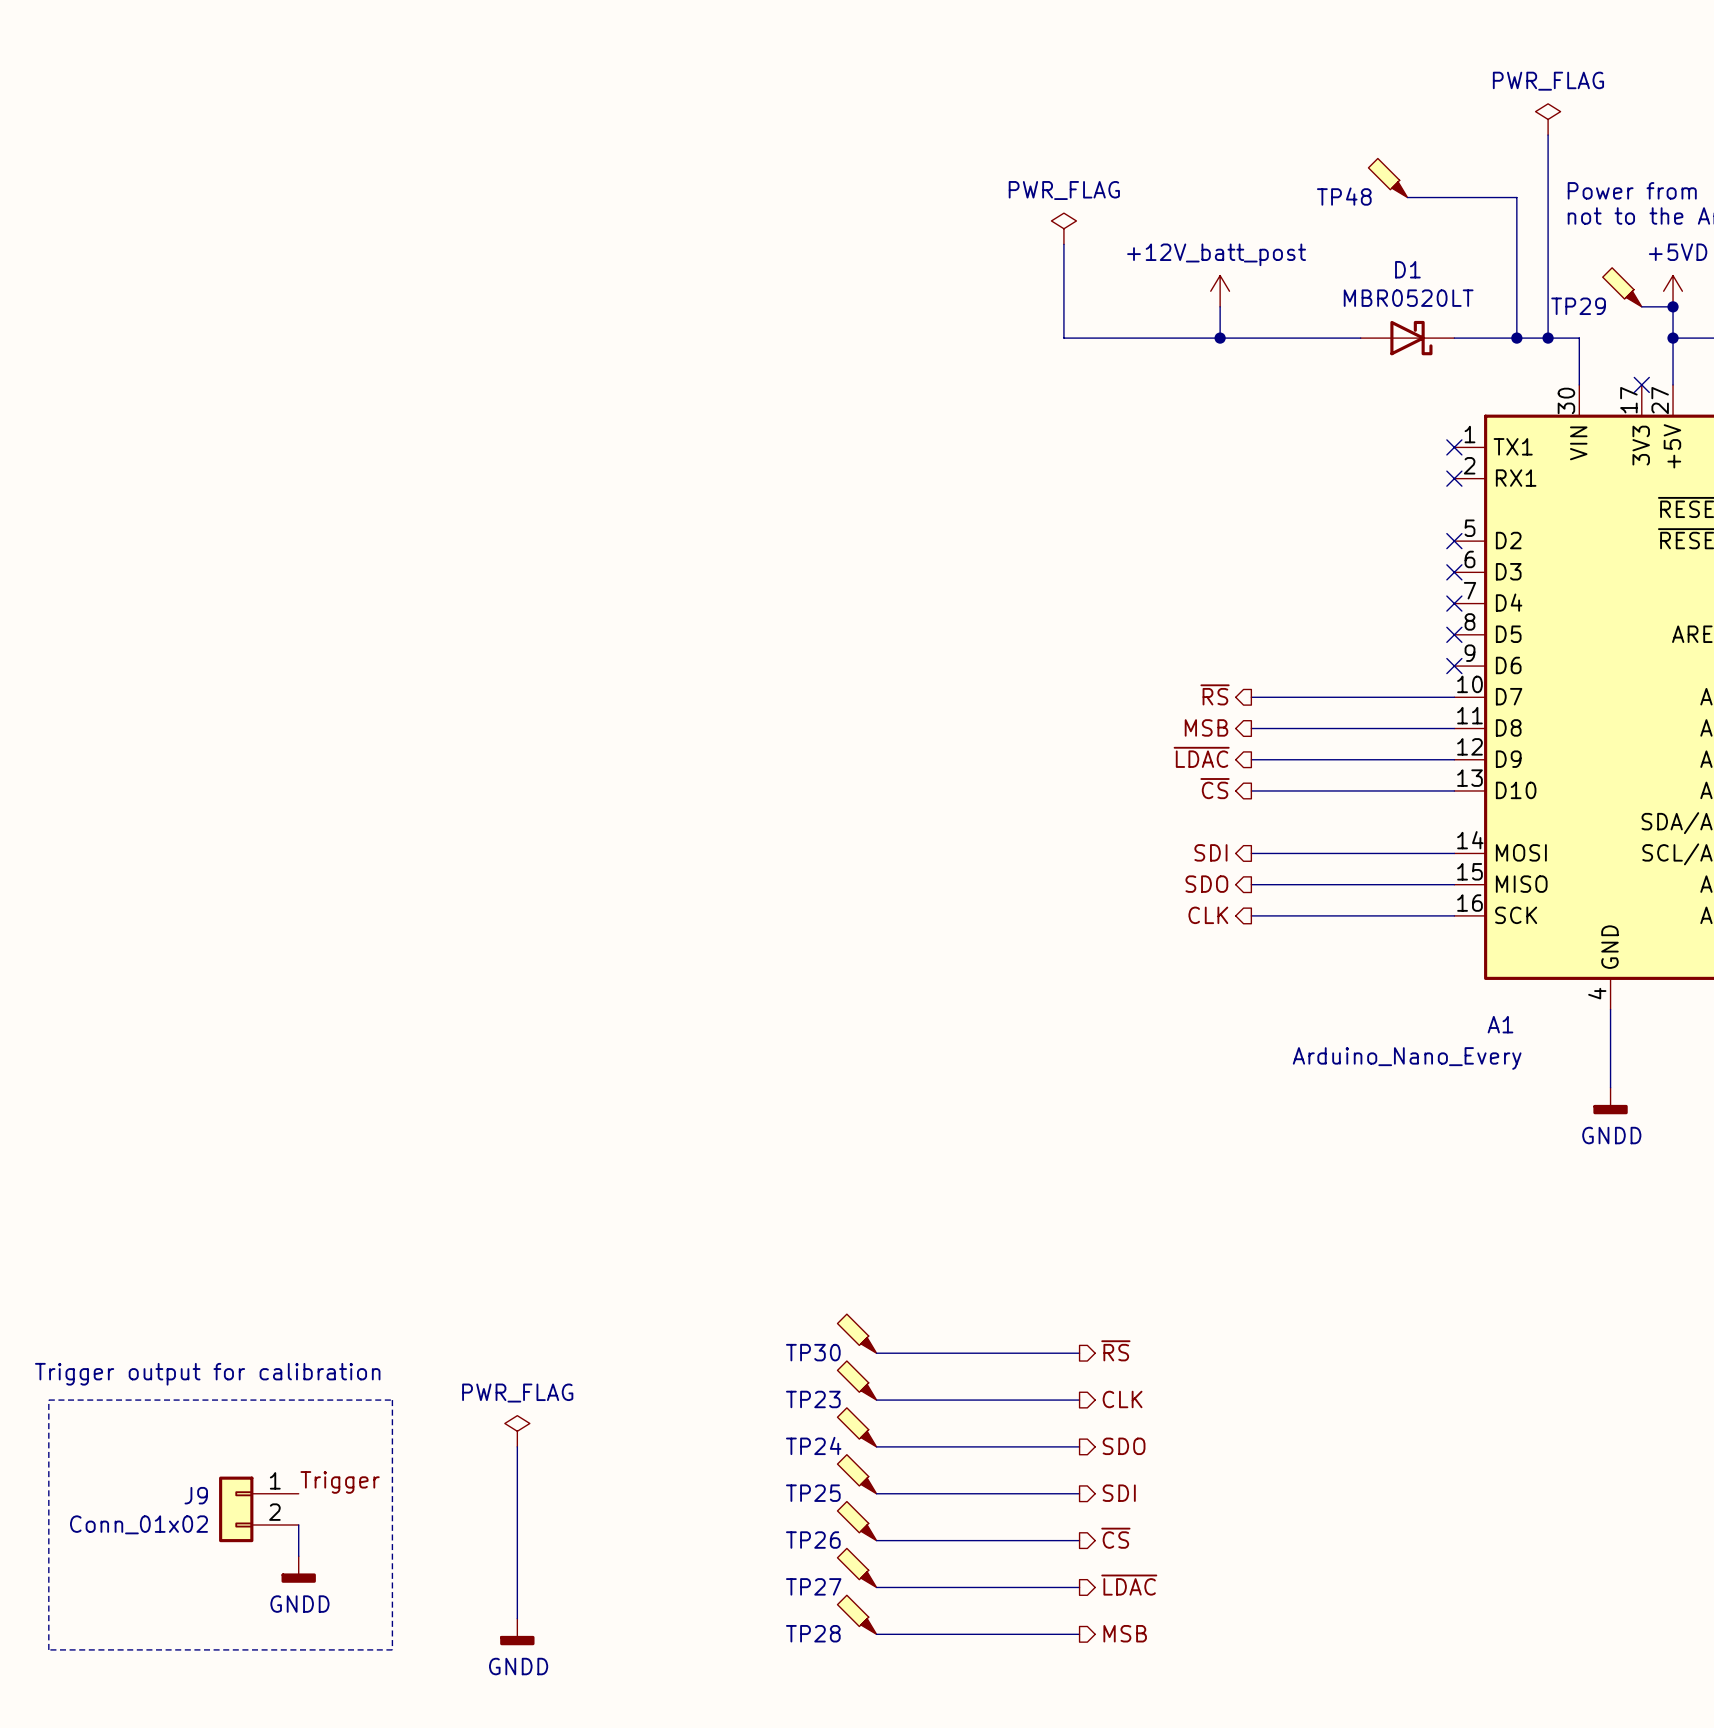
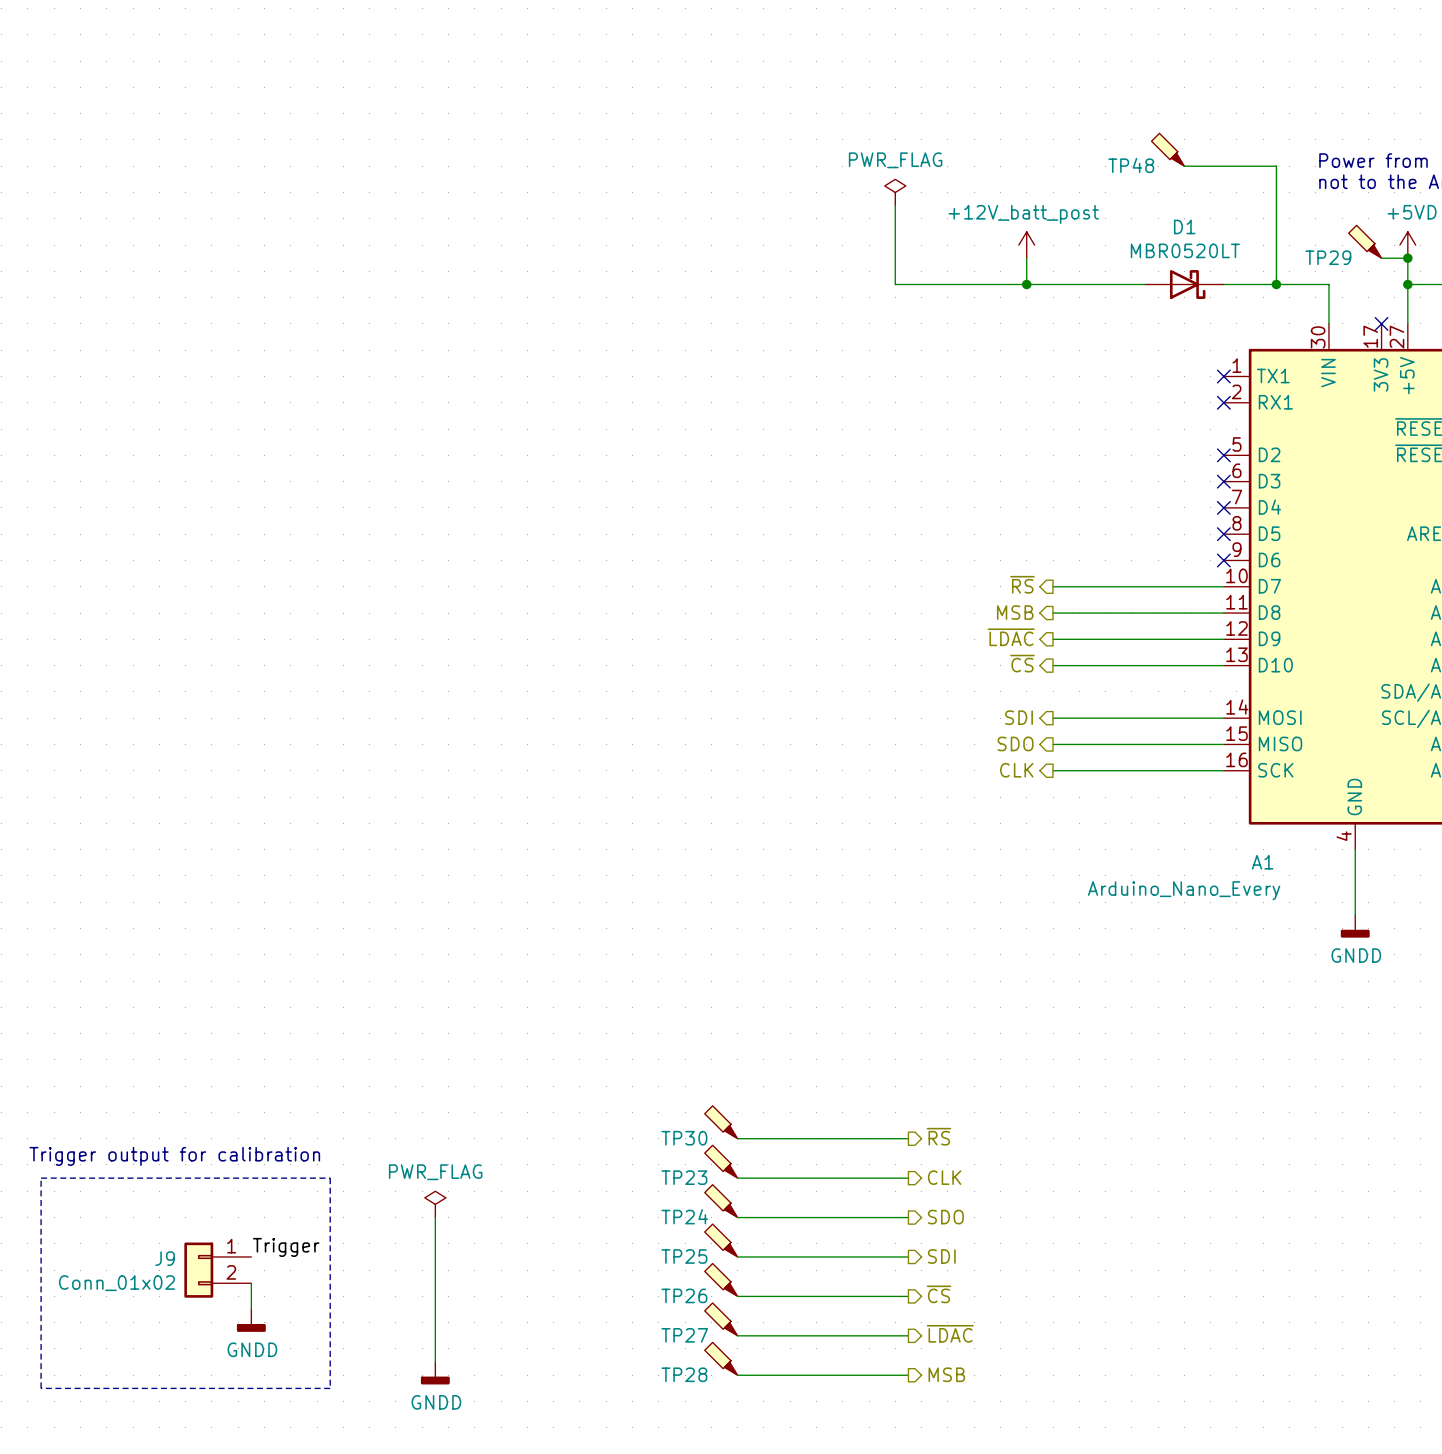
power symbol: PWR_FLAG (1548, 119) -> none
wire: (1548, 135) (1548, 338) -> none
junction: (1548, 338) -> none

